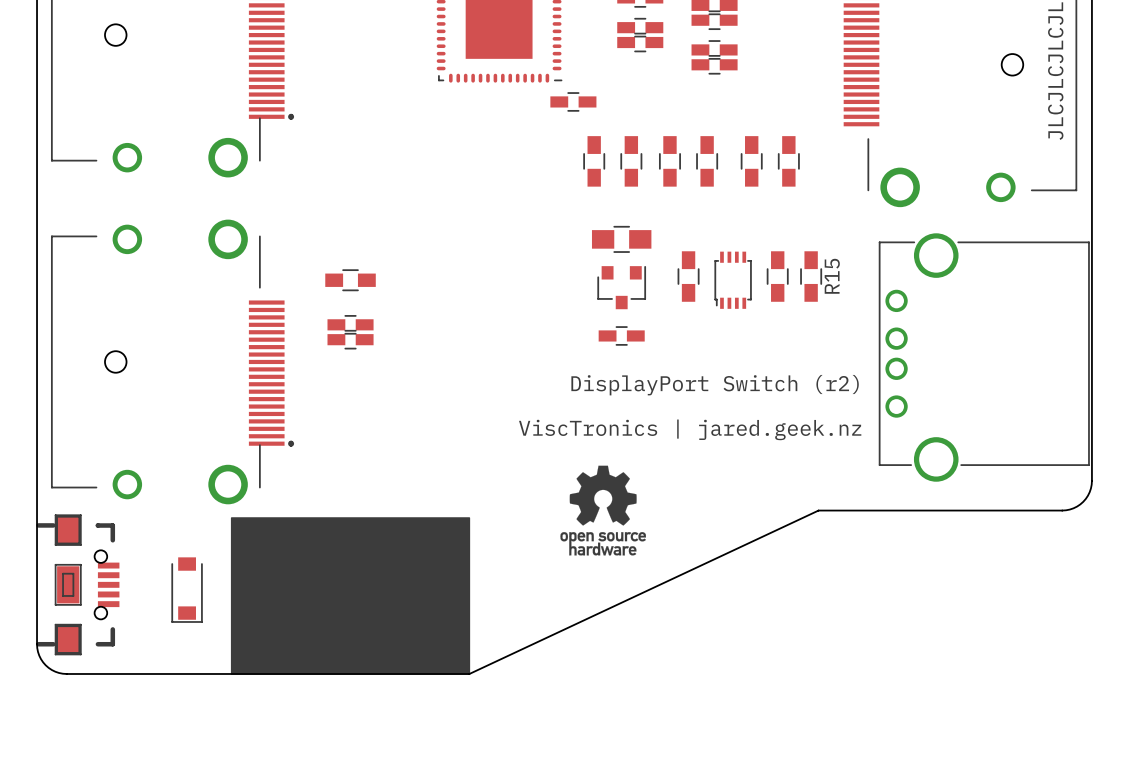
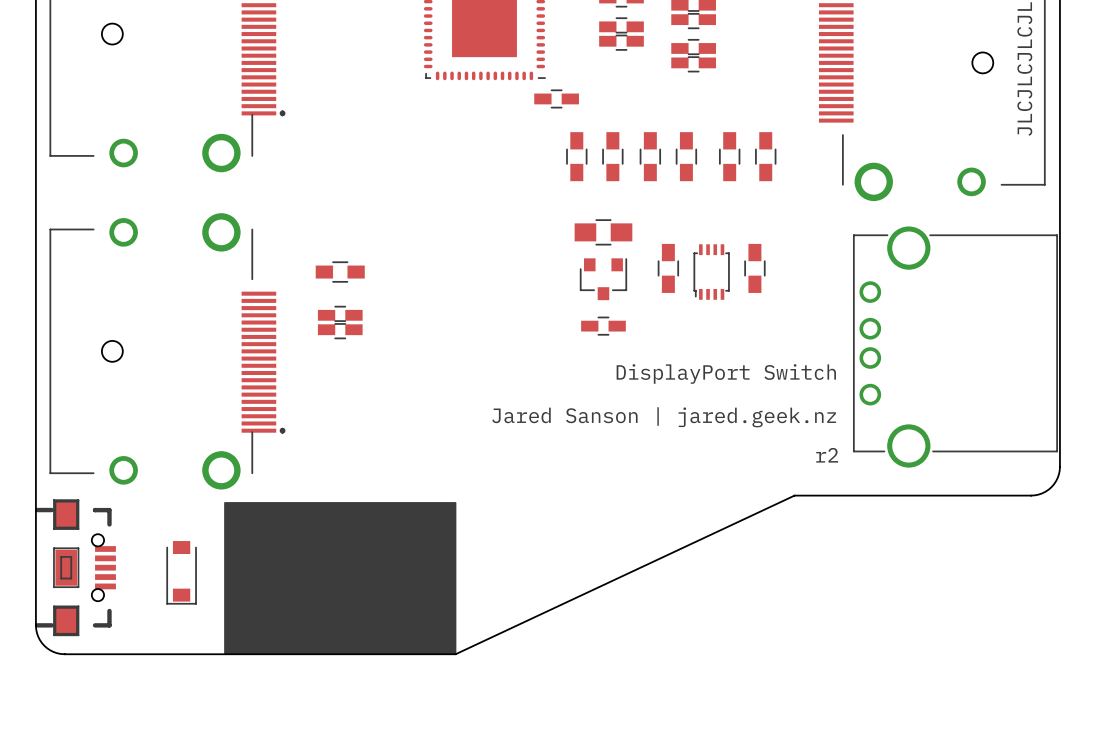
R15: (811, 276) -> none
text: DisplayPort Switch (r2) (715, 385) -> DisplayPort Switch (726, 374)
text: ViscTronics | jared.geek.nz (690, 429) -> Jared Sanson | jared.geek.nz (664, 417)
drawing: [560, 465, 646, 556] -> none
text: none -> r2 (827, 455)

